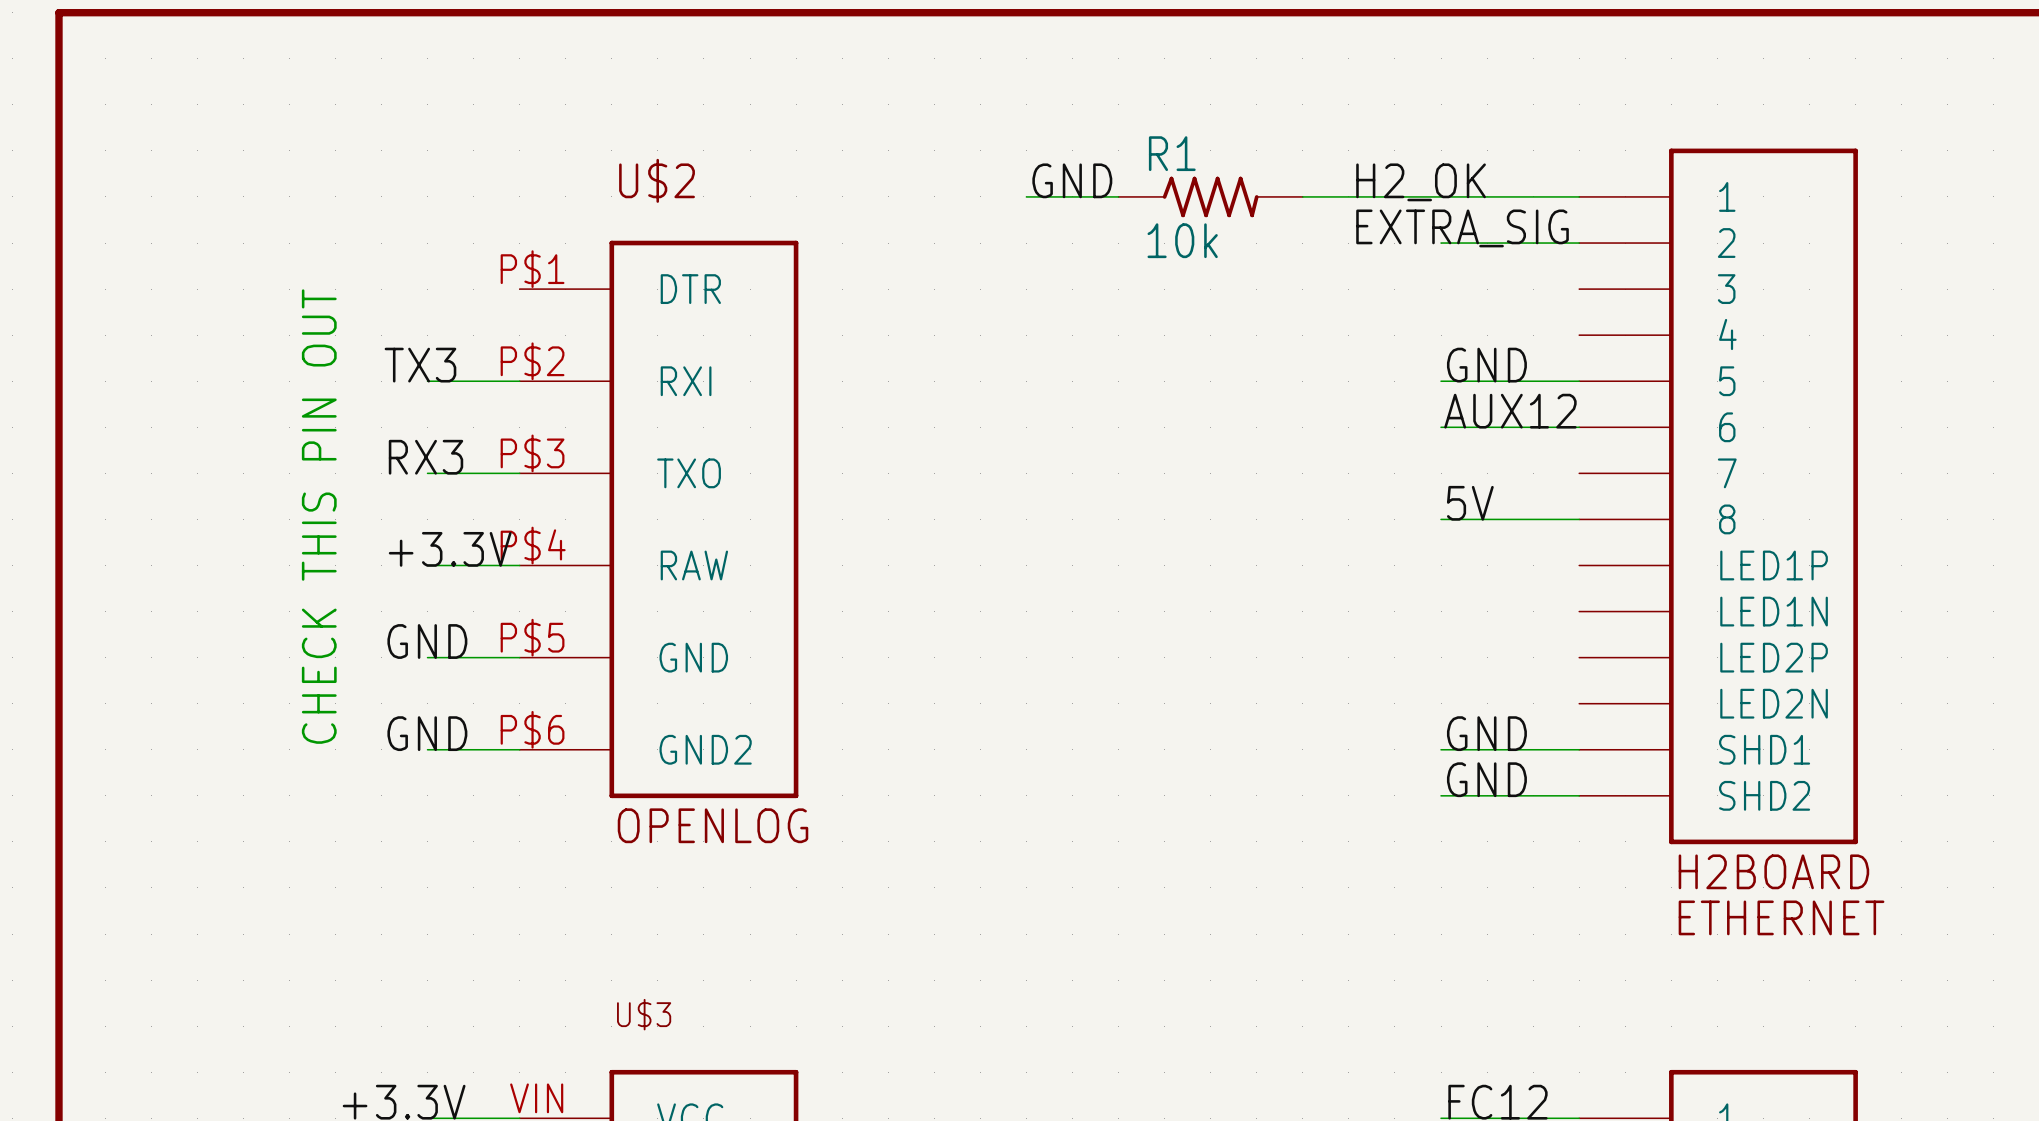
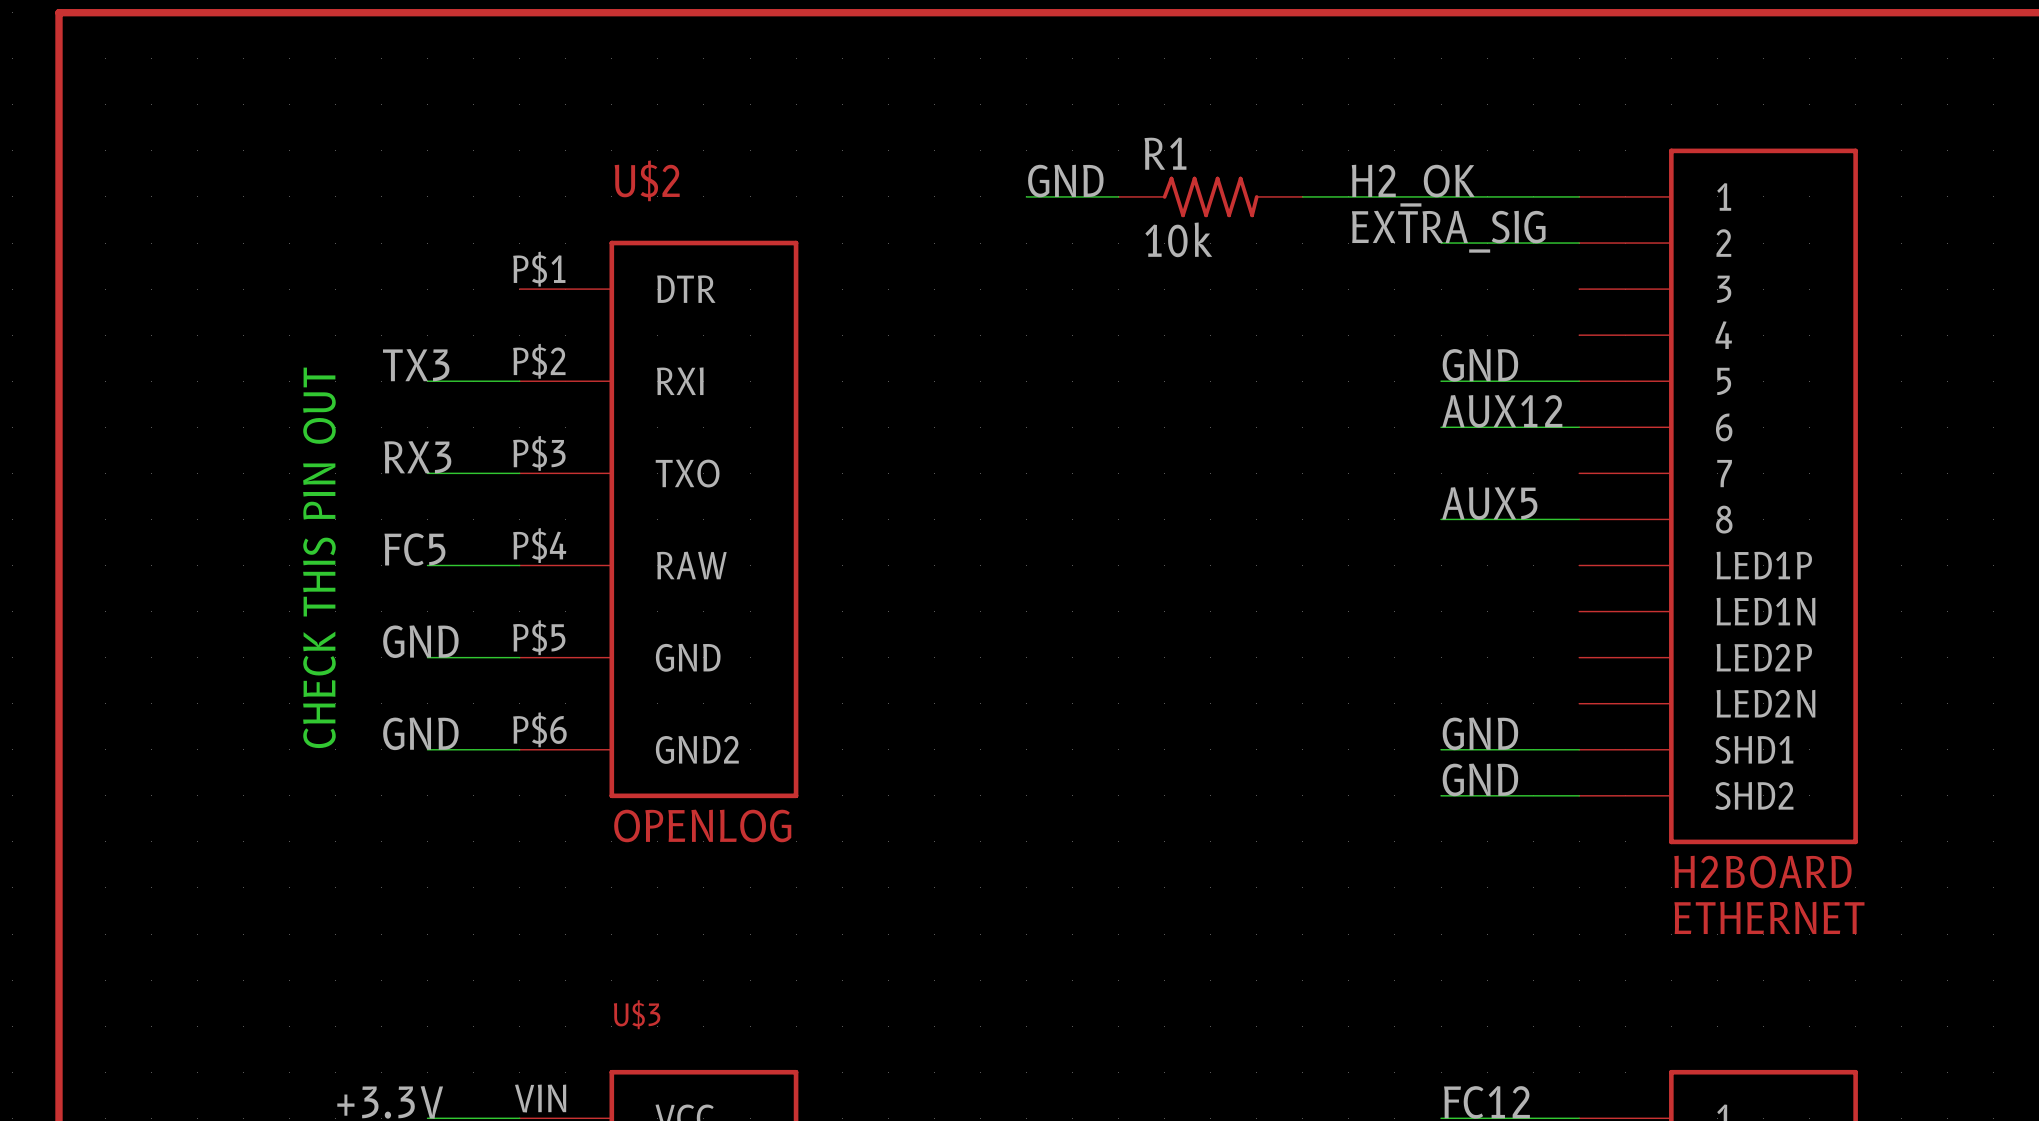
label: 5V (1470, 503) -> AUX5 (1489, 503)
label: +3.3V (450, 549) -> FC5 (414, 549)

